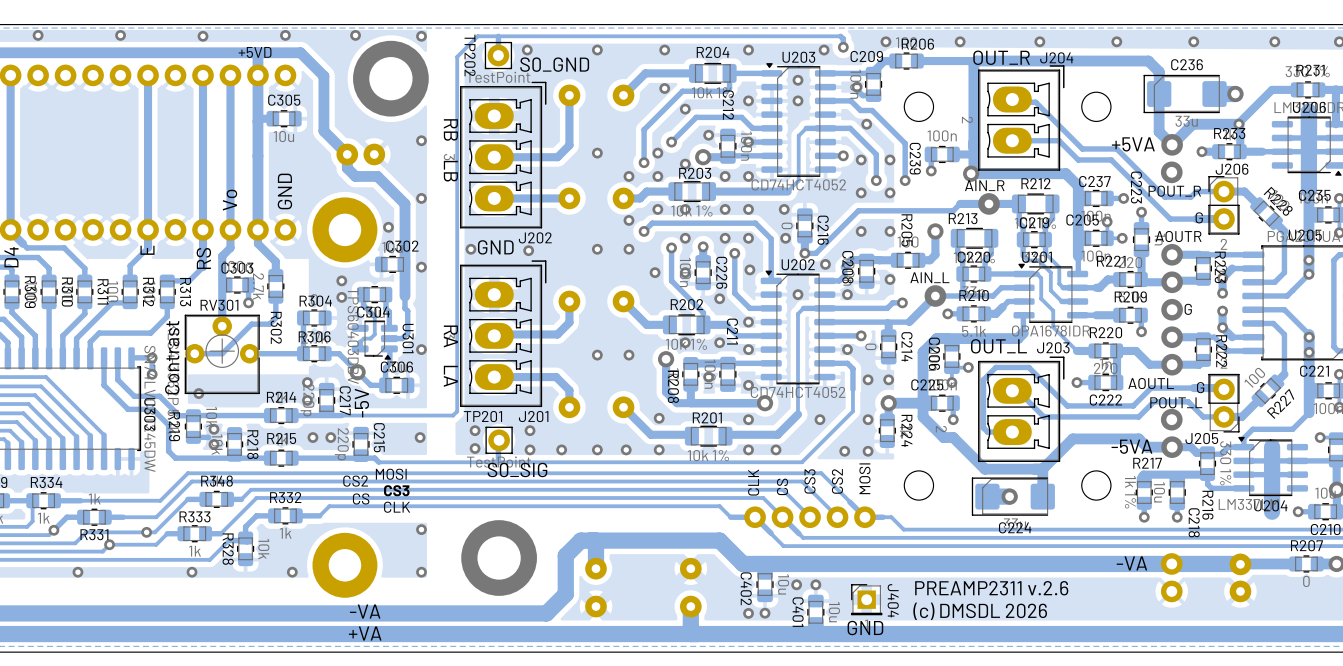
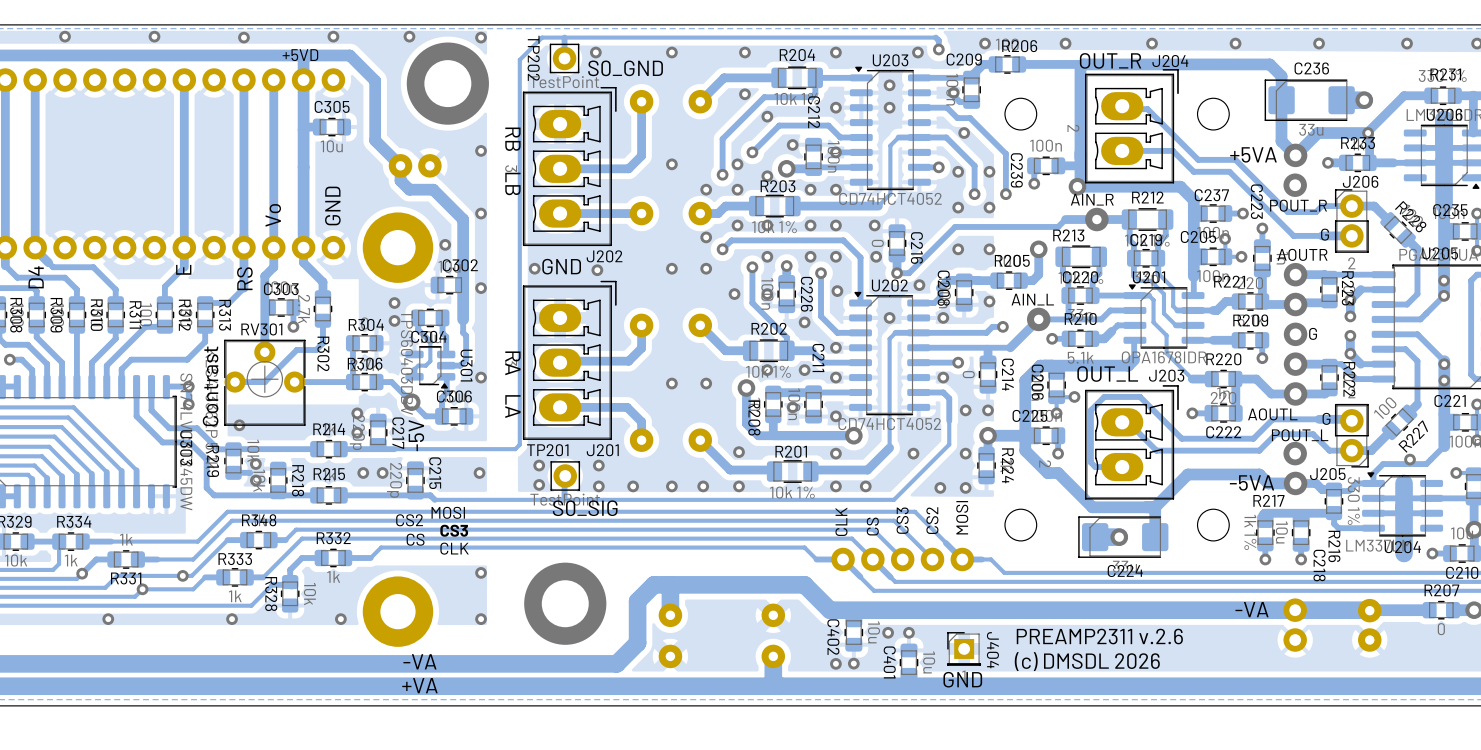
R205 name rotation: 0° (906, 230) -> 90° counterclockwise (1012, 260)
via: none -> (1410, 459)

